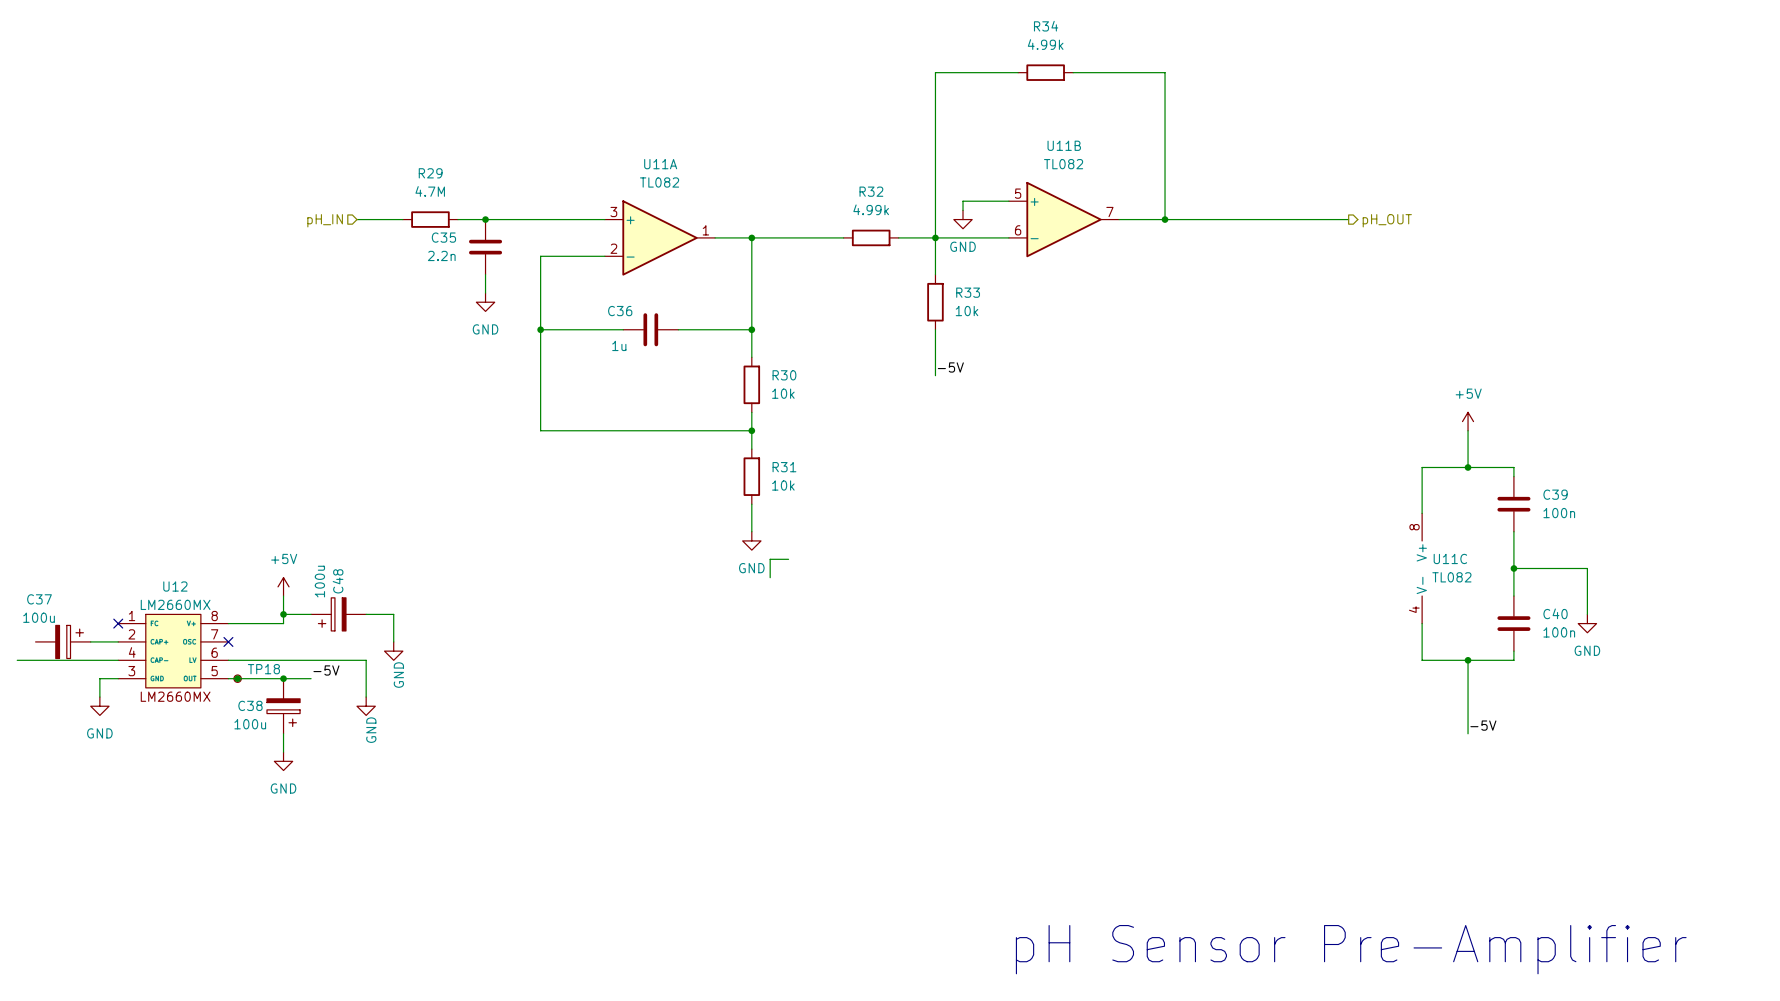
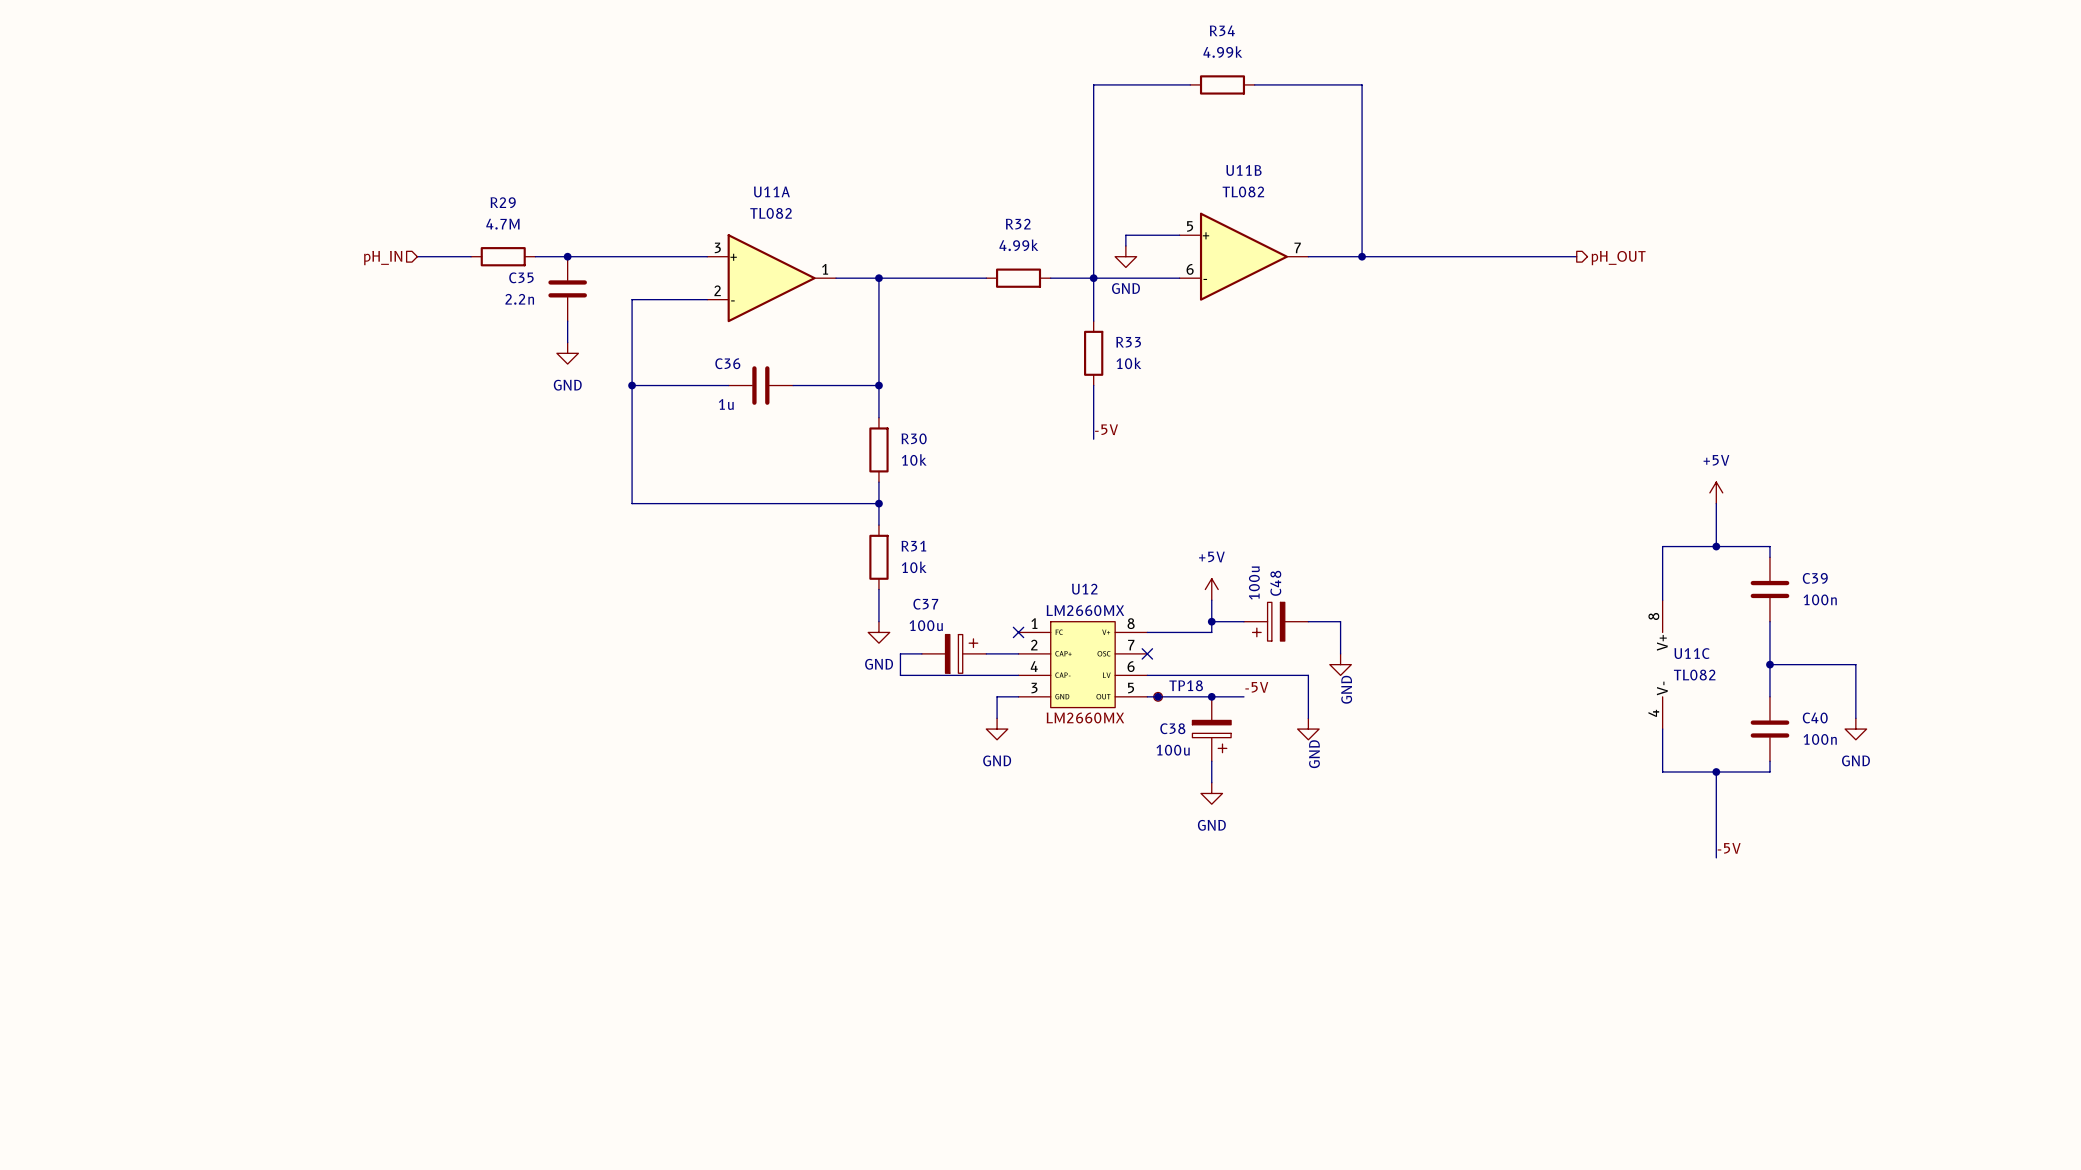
power symbol: none -> +5V (1211, 589)
wire: none -> (1211, 600) (1211, 632) (1147, 632)
wire: none -> (1211, 621) (1243, 621)
junction: none -> (1211, 621)
wire: none -> (1308, 621) (1340, 621) (1340, 653)
no-connect mark: none -> (1018, 632)
wire: none -> (986, 653) (1018, 653)
no-connect mark: none -> (1147, 653)
power symbol: none -> GND (1340, 664)
wire: none -> (900, 675) (1018, 675)
wire: none -> (1147, 675) (1308, 675) (1308, 718)
power symbol: +5V (283, 586) -> none
label: none -> -5V (1256, 687)
wire: (283, 596) (283, 623) (228, 623) -> none
wire: none -> (1018, 696) (997, 696) (997, 718)
wire: none -> (1147, 696) (1243, 696)
junction: none -> (1158, 696)
junction: none -> (1211, 696)
wire: (283, 614) (311, 614) -> none
junction: (283, 614) -> none
C48 position: (338, 614) -> (1276, 621)
wire: (366, 614) (393, 614) (393, 641) -> none
no-connect mark: (118, 623) -> none
power symbol: none -> GND (997, 729)
power symbol: none -> GND (1308, 729)
C37 position: (63, 641) -> (954, 653)
wire: (90, 641) (118, 641) -> none
no-connect mark: (228, 641) -> none
U12 position: (173, 651) -> (1082, 664)
power symbol: GND (393, 651) -> none
wire: none -> (1211, 761) (1211, 782)
wire: (17, 660) (118, 660) -> none
wire: (228, 660) (366, 660) (366, 697) -> none
label: -5V (326, 670) -> none
wire: (118, 678) (99, 678) (99, 697) -> none
wire: (228, 678) (311, 678) -> none
junction: (237, 678) -> none
TP18 position: (237, 678) -> (1158, 696)
junction: (283, 678) -> none
power symbol: none -> GND (1211, 793)
power symbol: GND (99, 706) -> none
C38 position: (283, 706) -> (1211, 729)
power symbol: GND (366, 706) -> none
wire: (283, 733) (283, 752) -> none
power symbol: GND (283, 761) -> none
text: pH Sensor Pre-Amplifier (1351, 949) -> none

